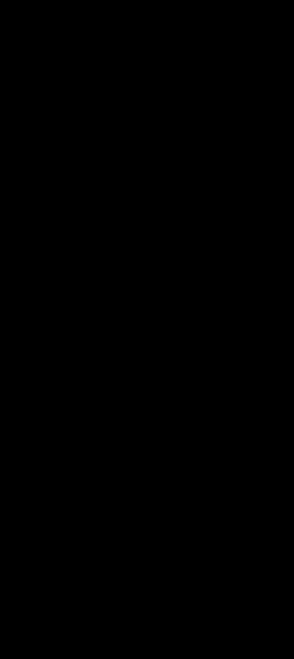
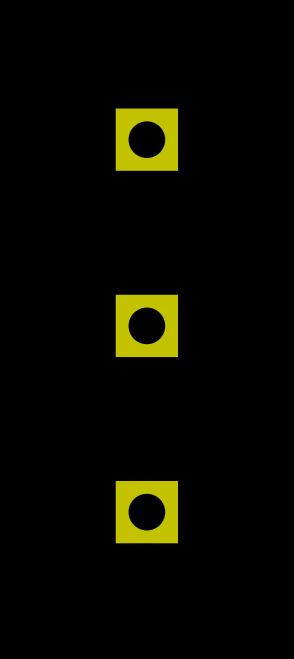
part: none -> (146, 139)
part: none -> (146, 325)
part: none -> (146, 512)

